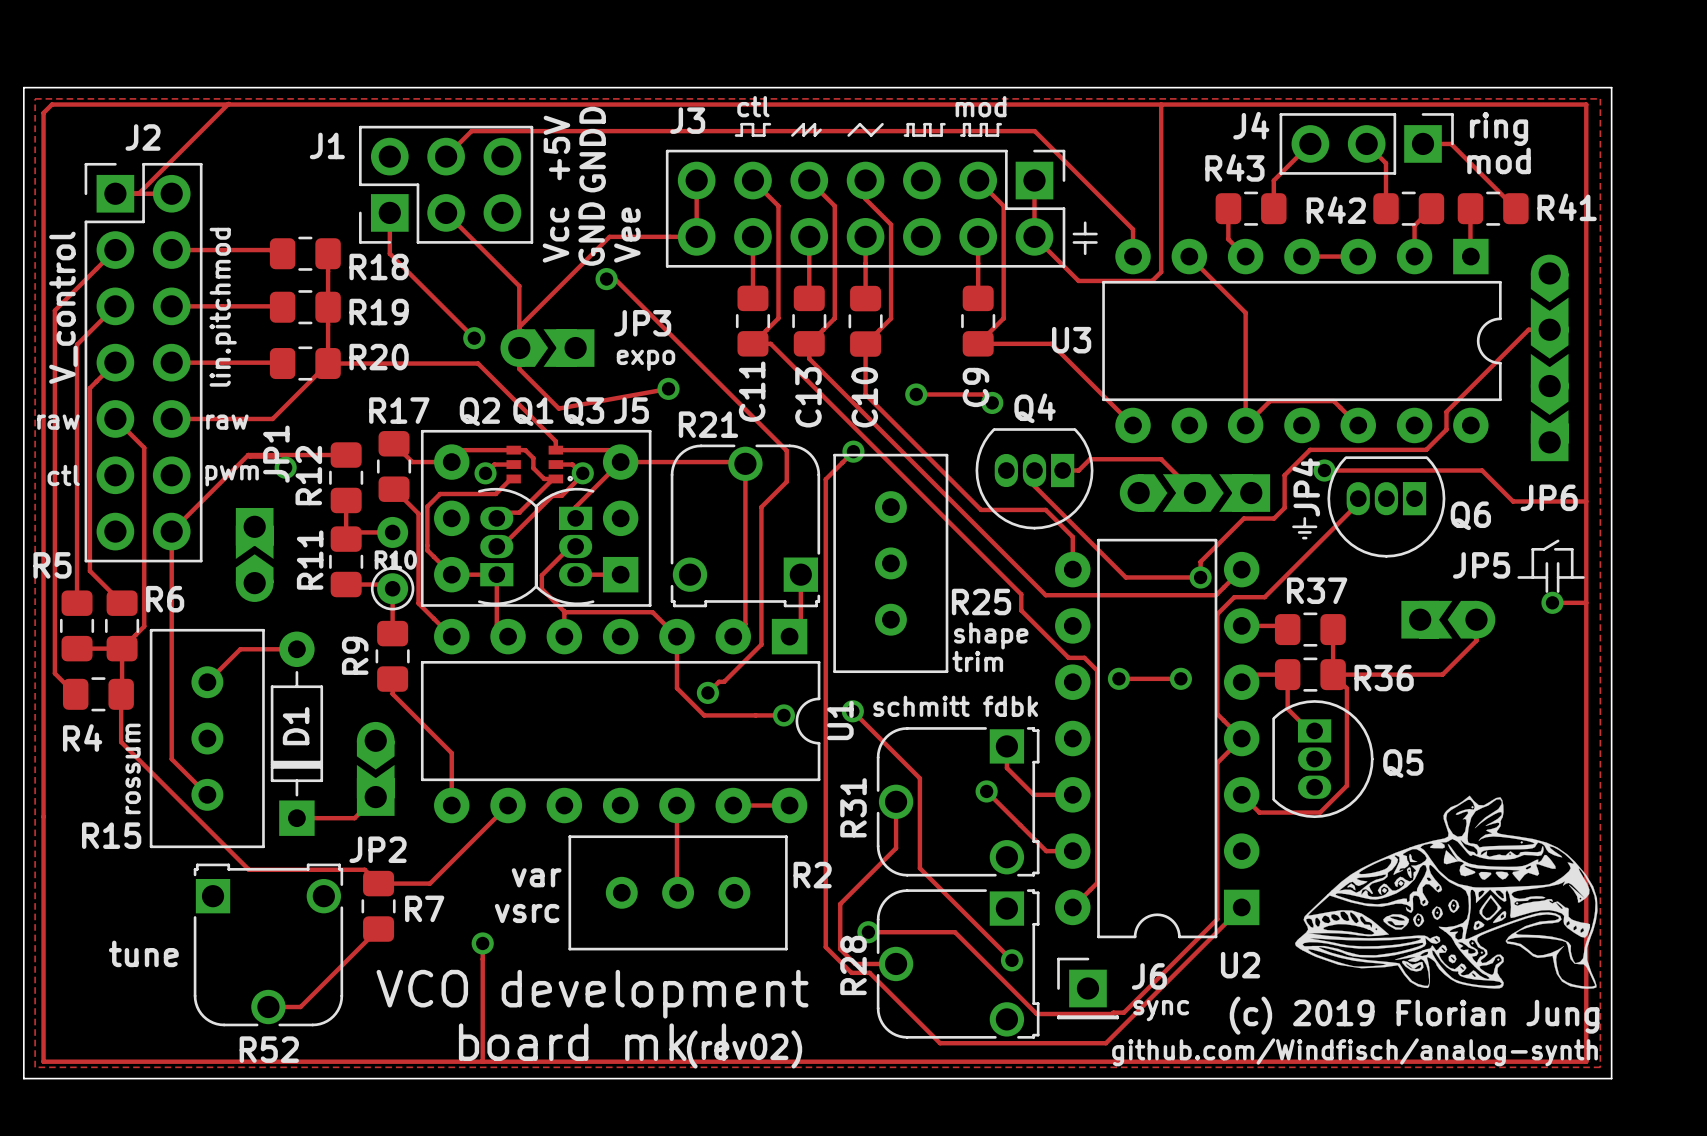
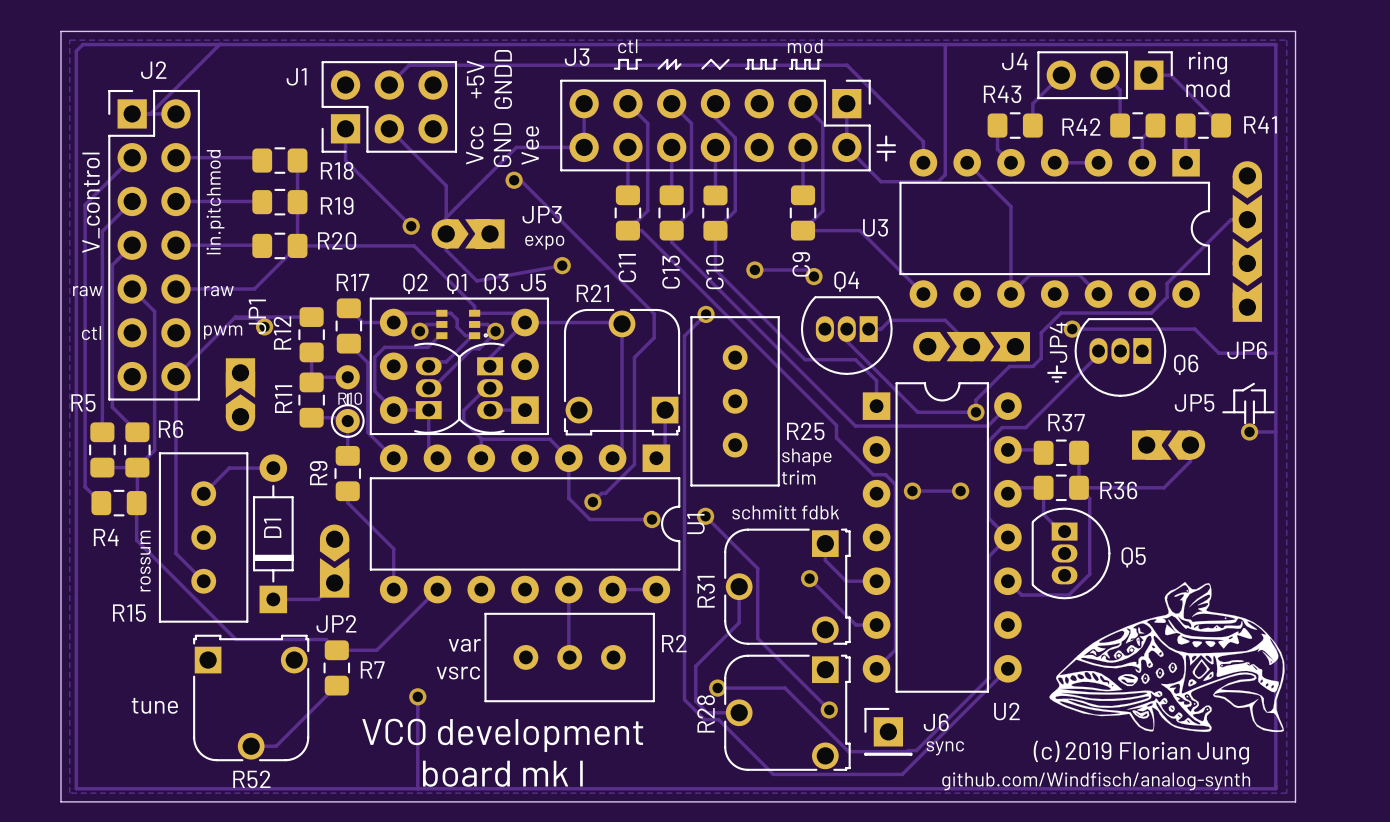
U2 rotation: 0° (1157, 738) -> 180° (942, 537)
text: (rev02) (744, 1049) -> none

